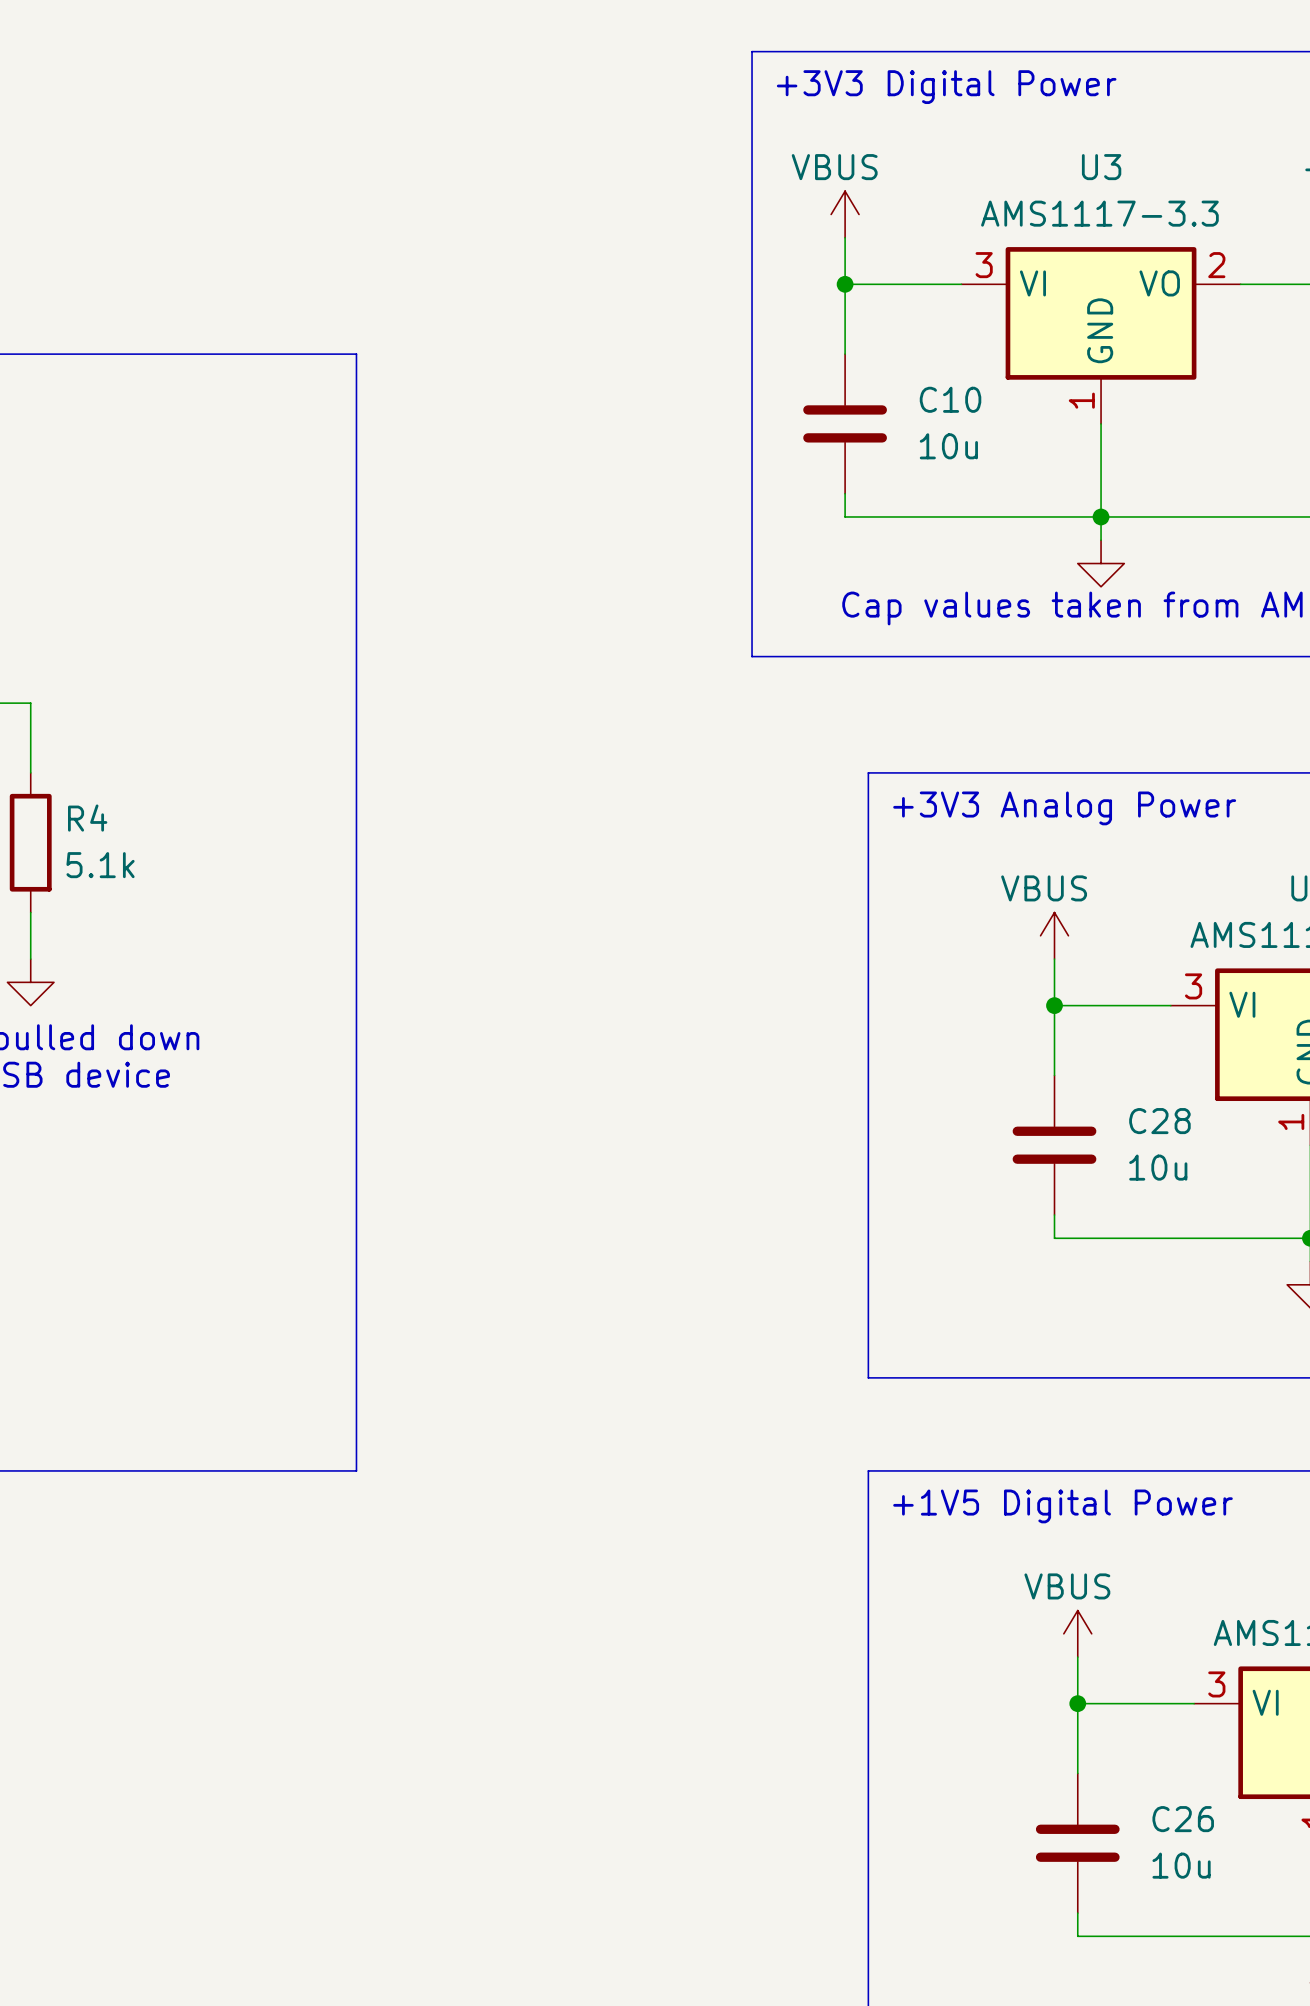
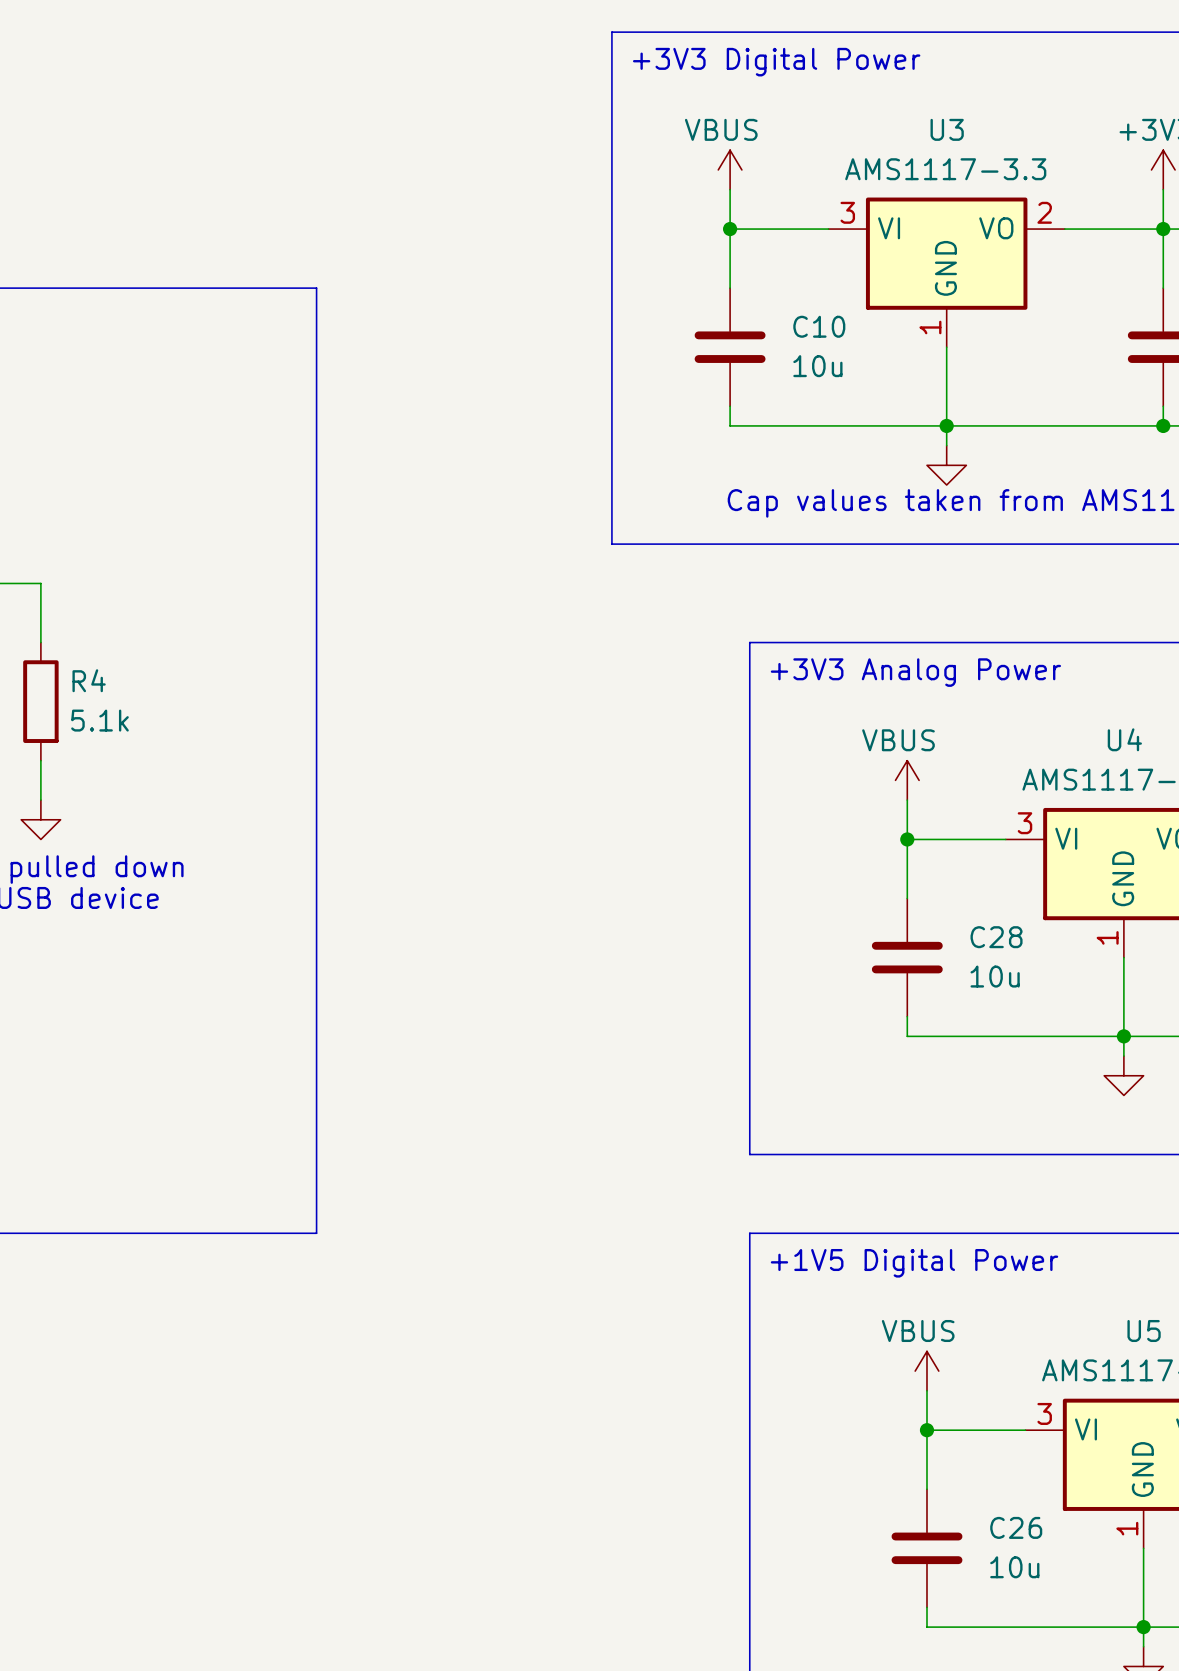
line: (752, 51) (752, 656) -> (651, 32) (611, 32) (611, 544) (651, 544)
text position: +3V3 Digital Power (946, 87) -> +3V3 Digital Power (776, 62)

